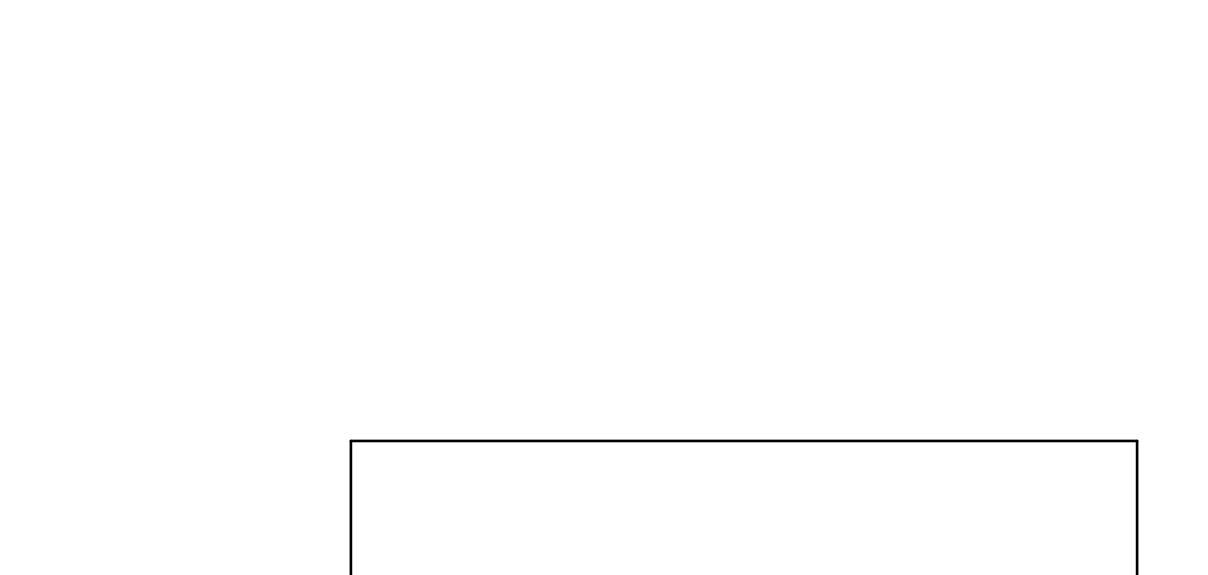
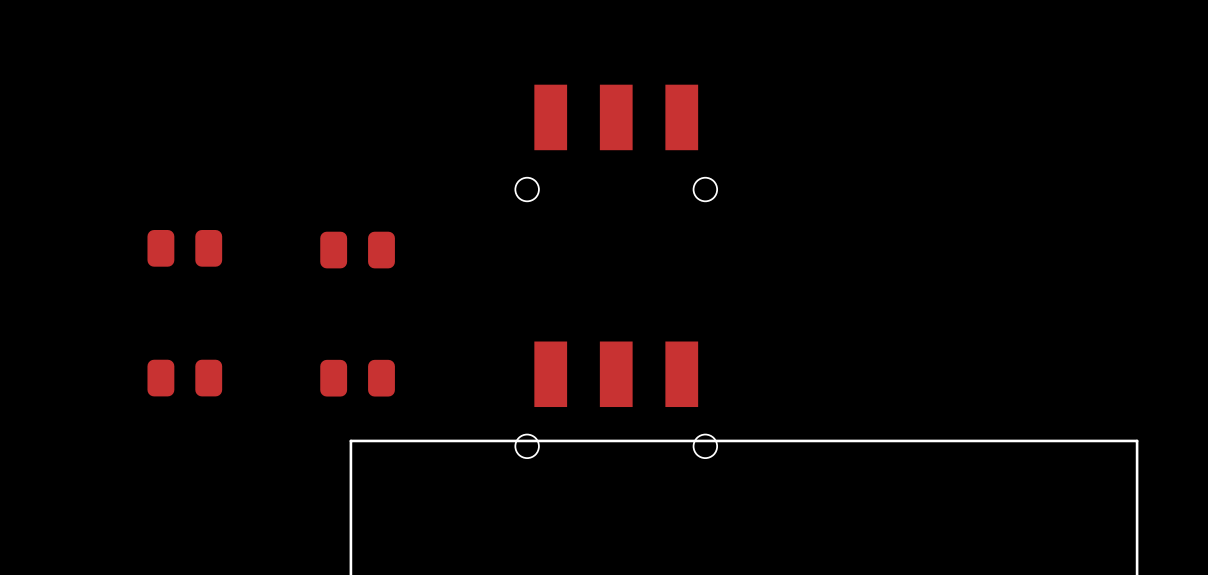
part: none -> (616, 142)
part: none -> (184, 248)
part: none -> (357, 250)
part: none -> (184, 378)
part: none -> (357, 378)
part: none -> (616, 399)

